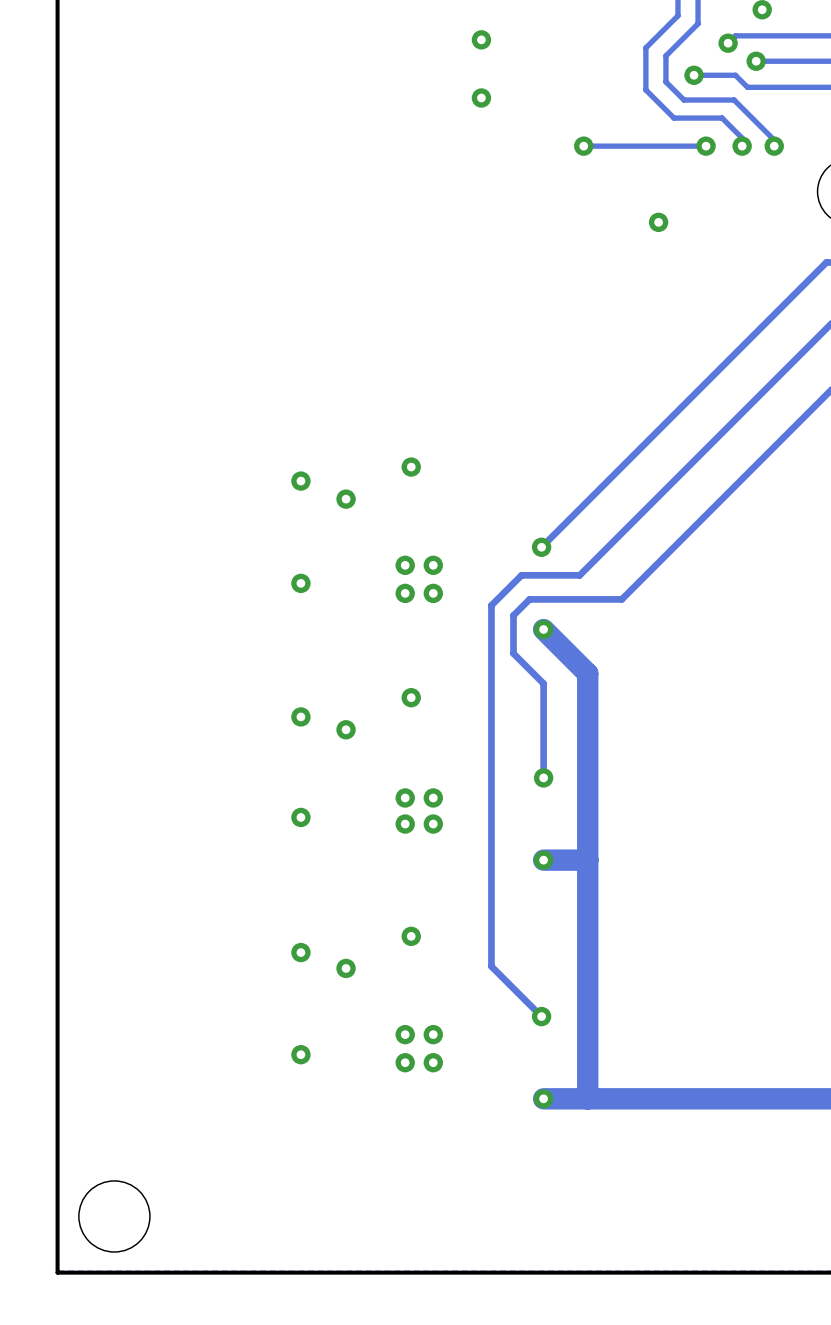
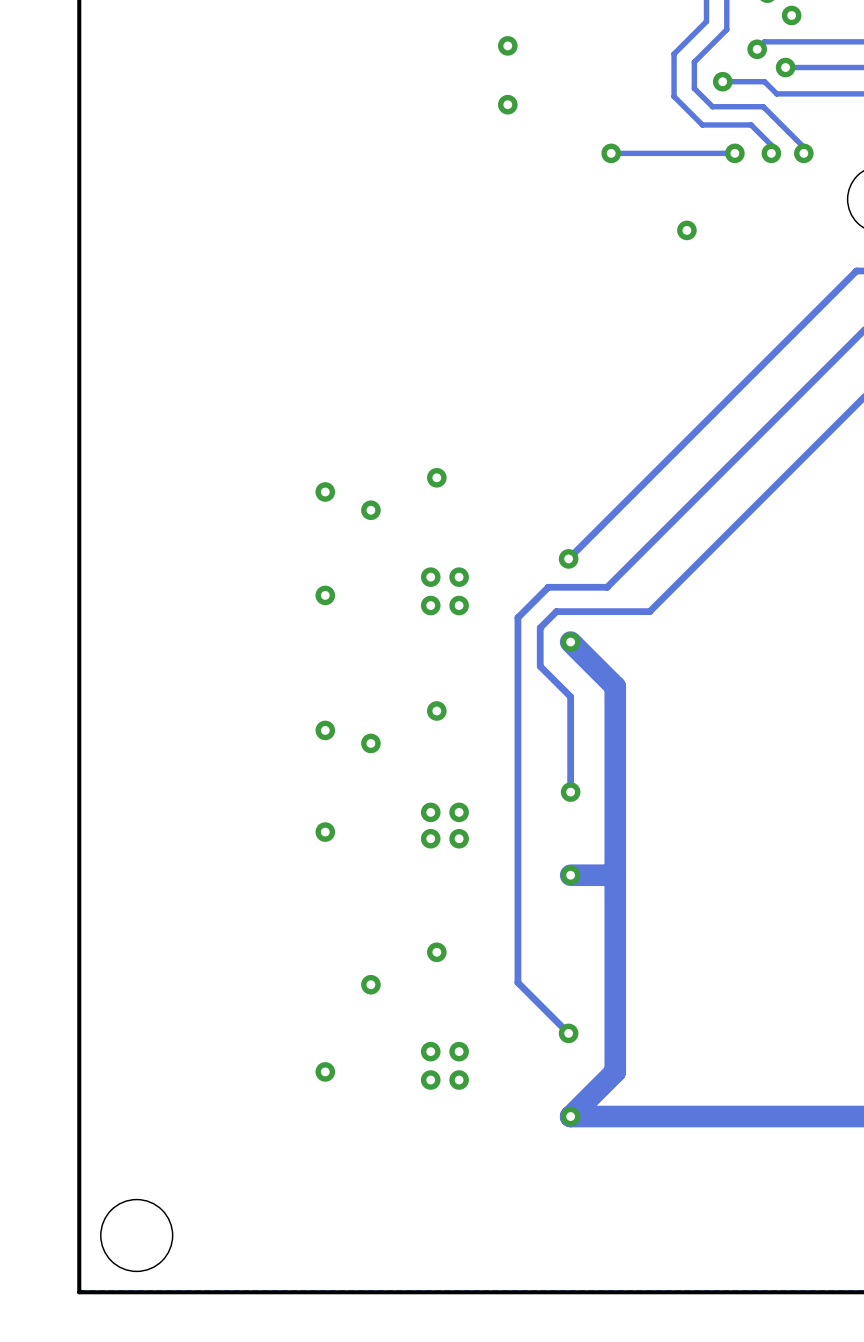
via: (300, 952) -> none
track: (587, 1054) (587, 1098) -> (615, 1071) (570, 1116)

